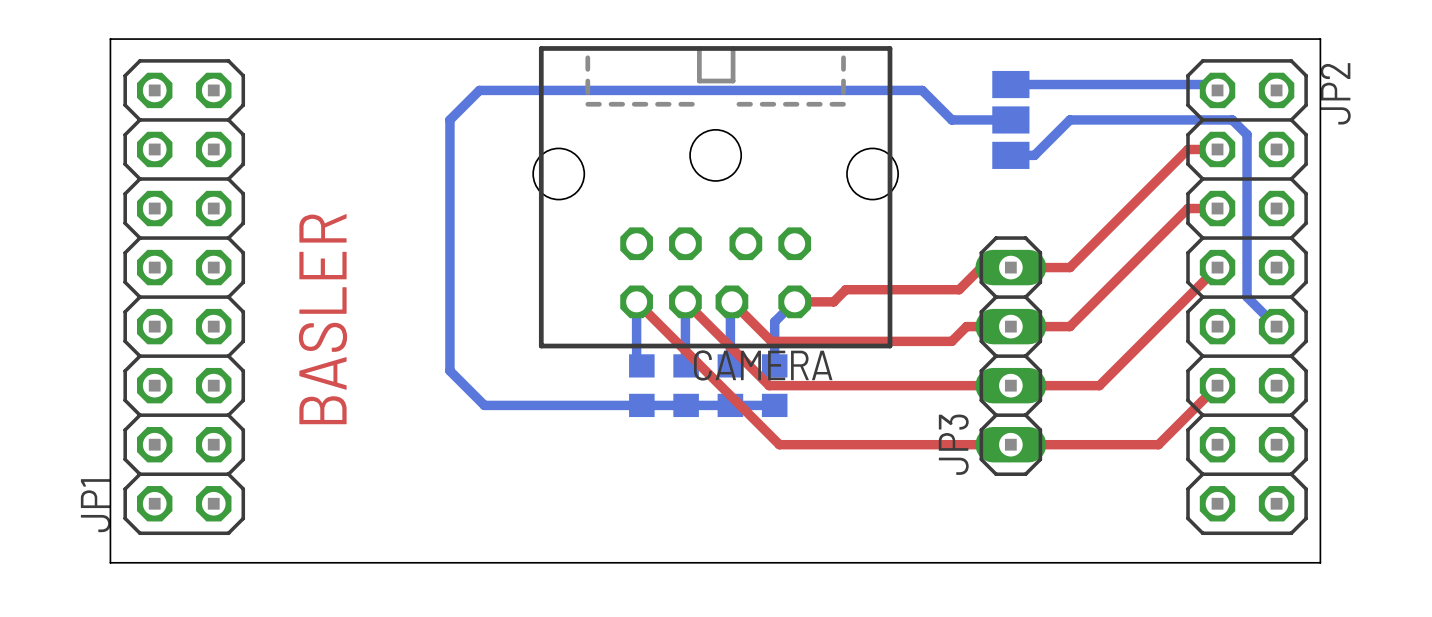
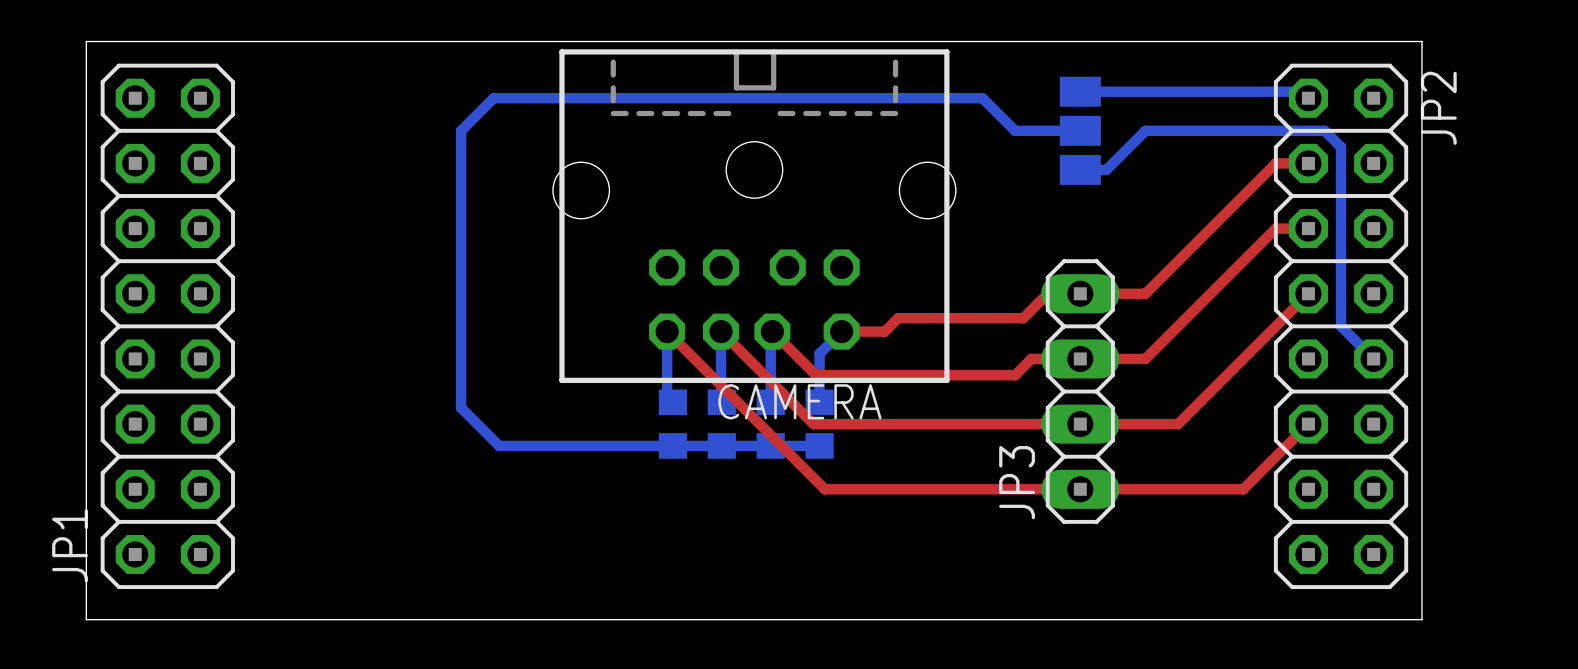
text: BASLER (322, 319) -> none

